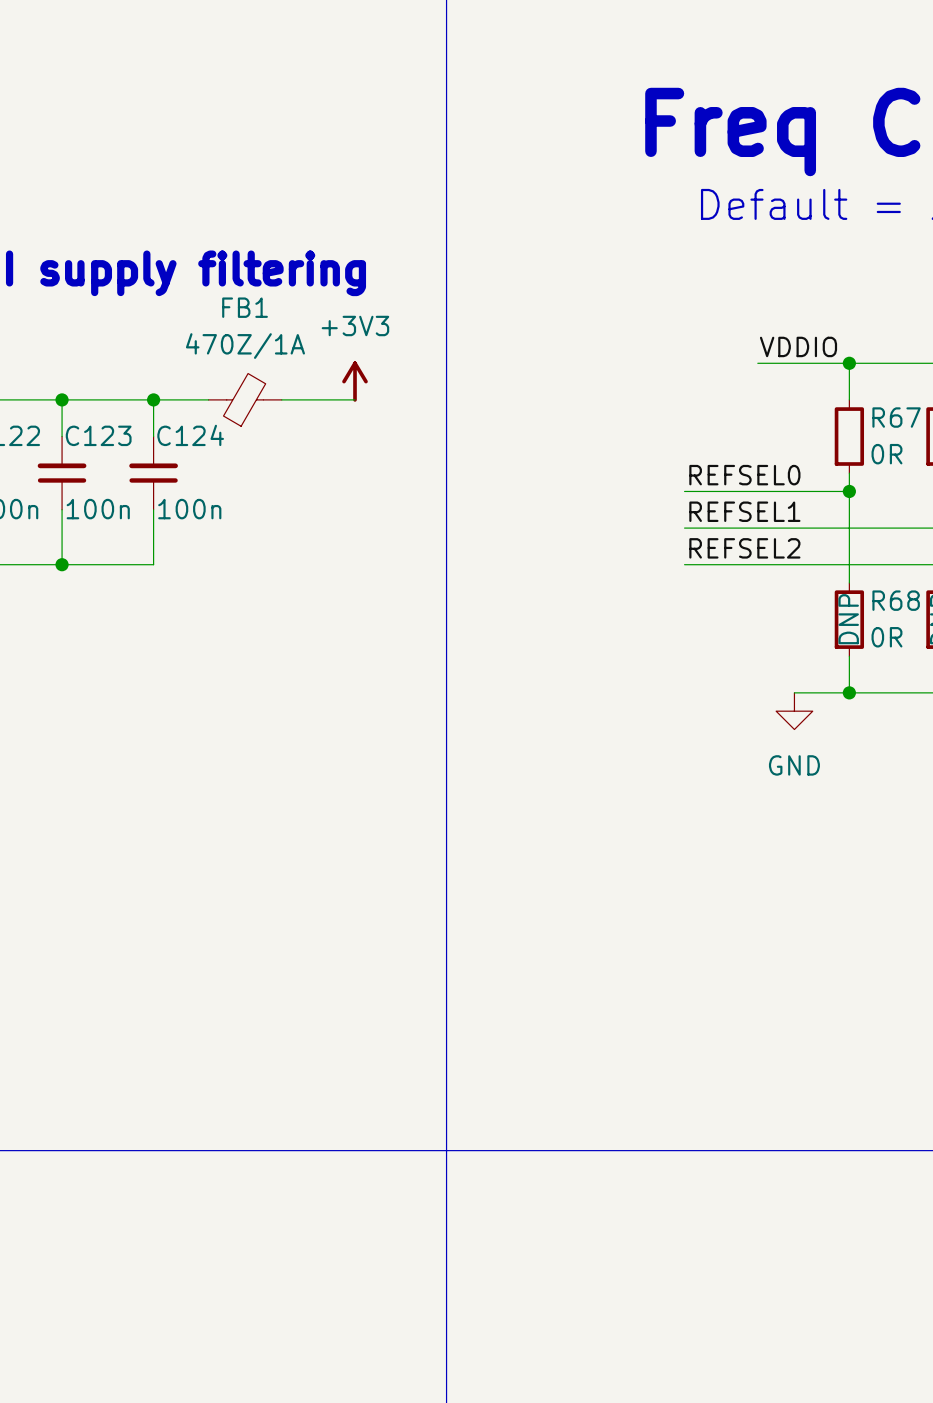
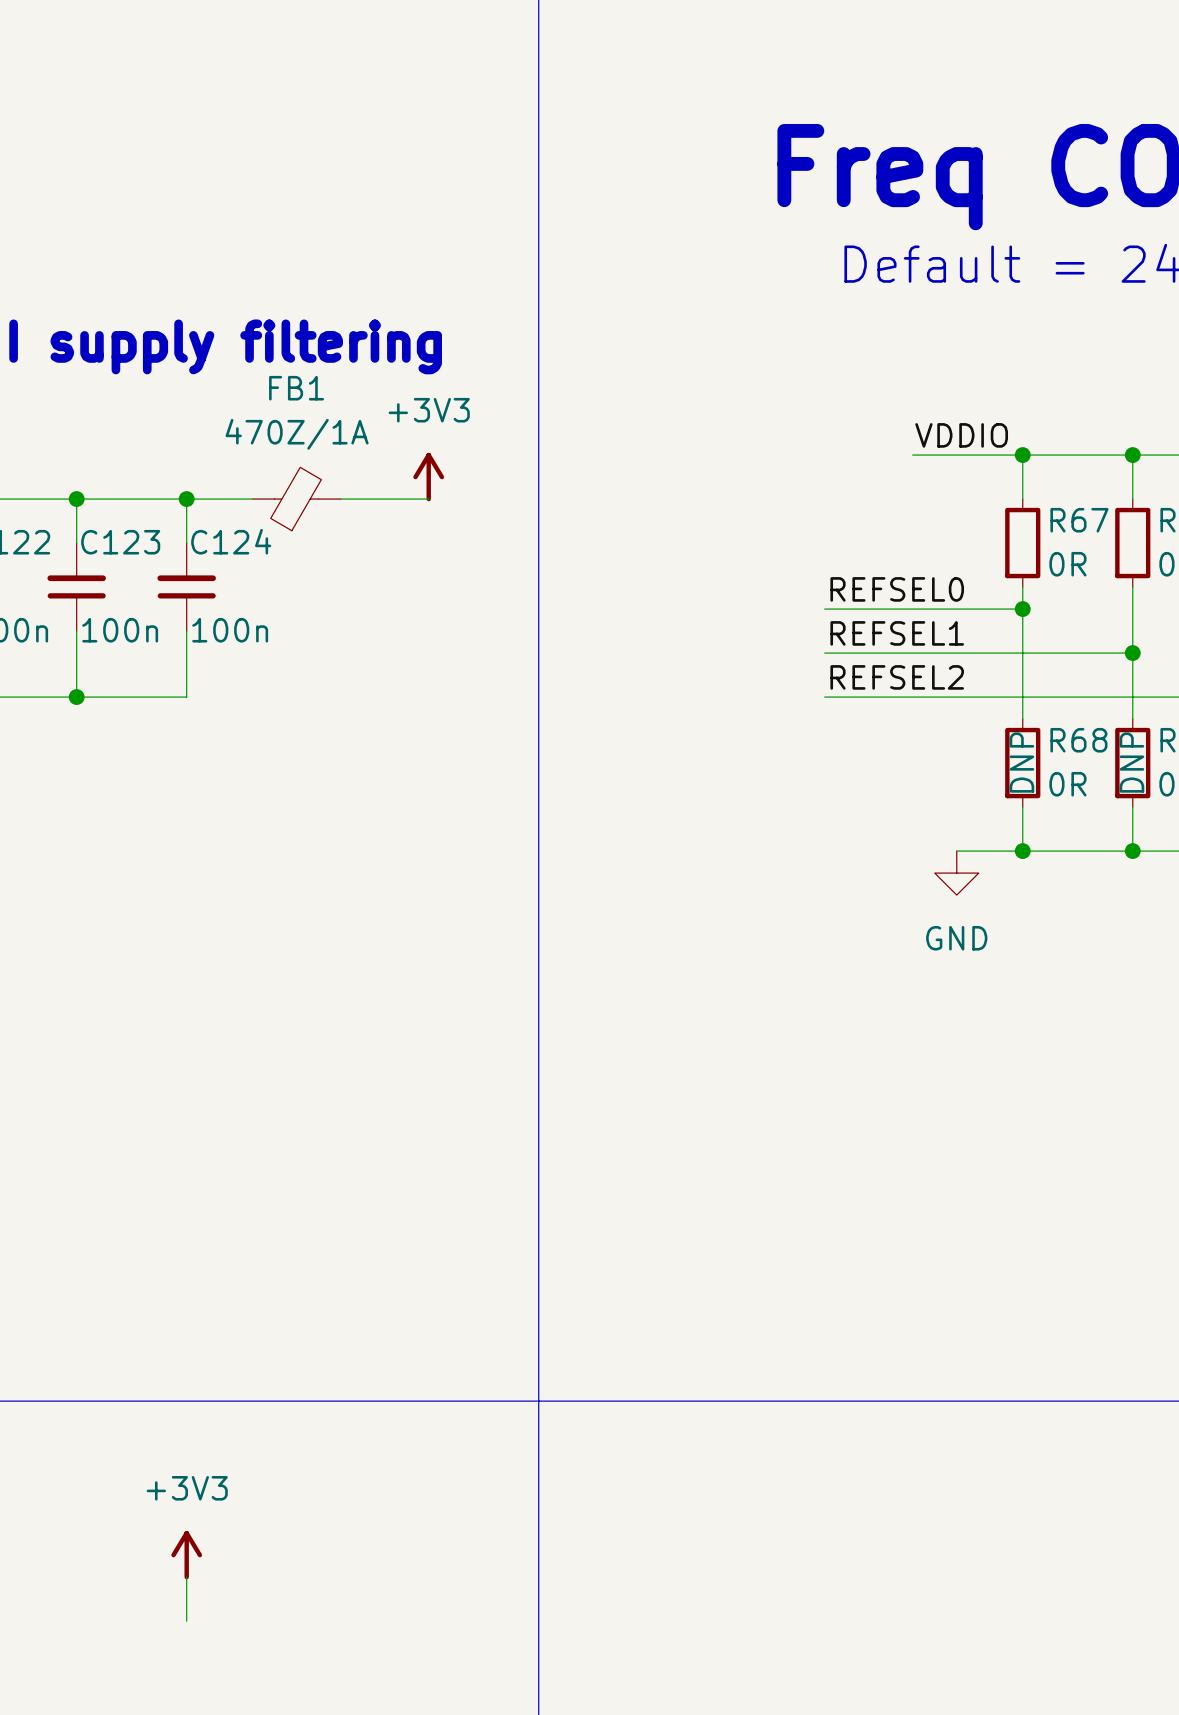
power symbol: none -> +3V3 (186, 1555)
wire: none -> (186, 1577) (186, 1621)

